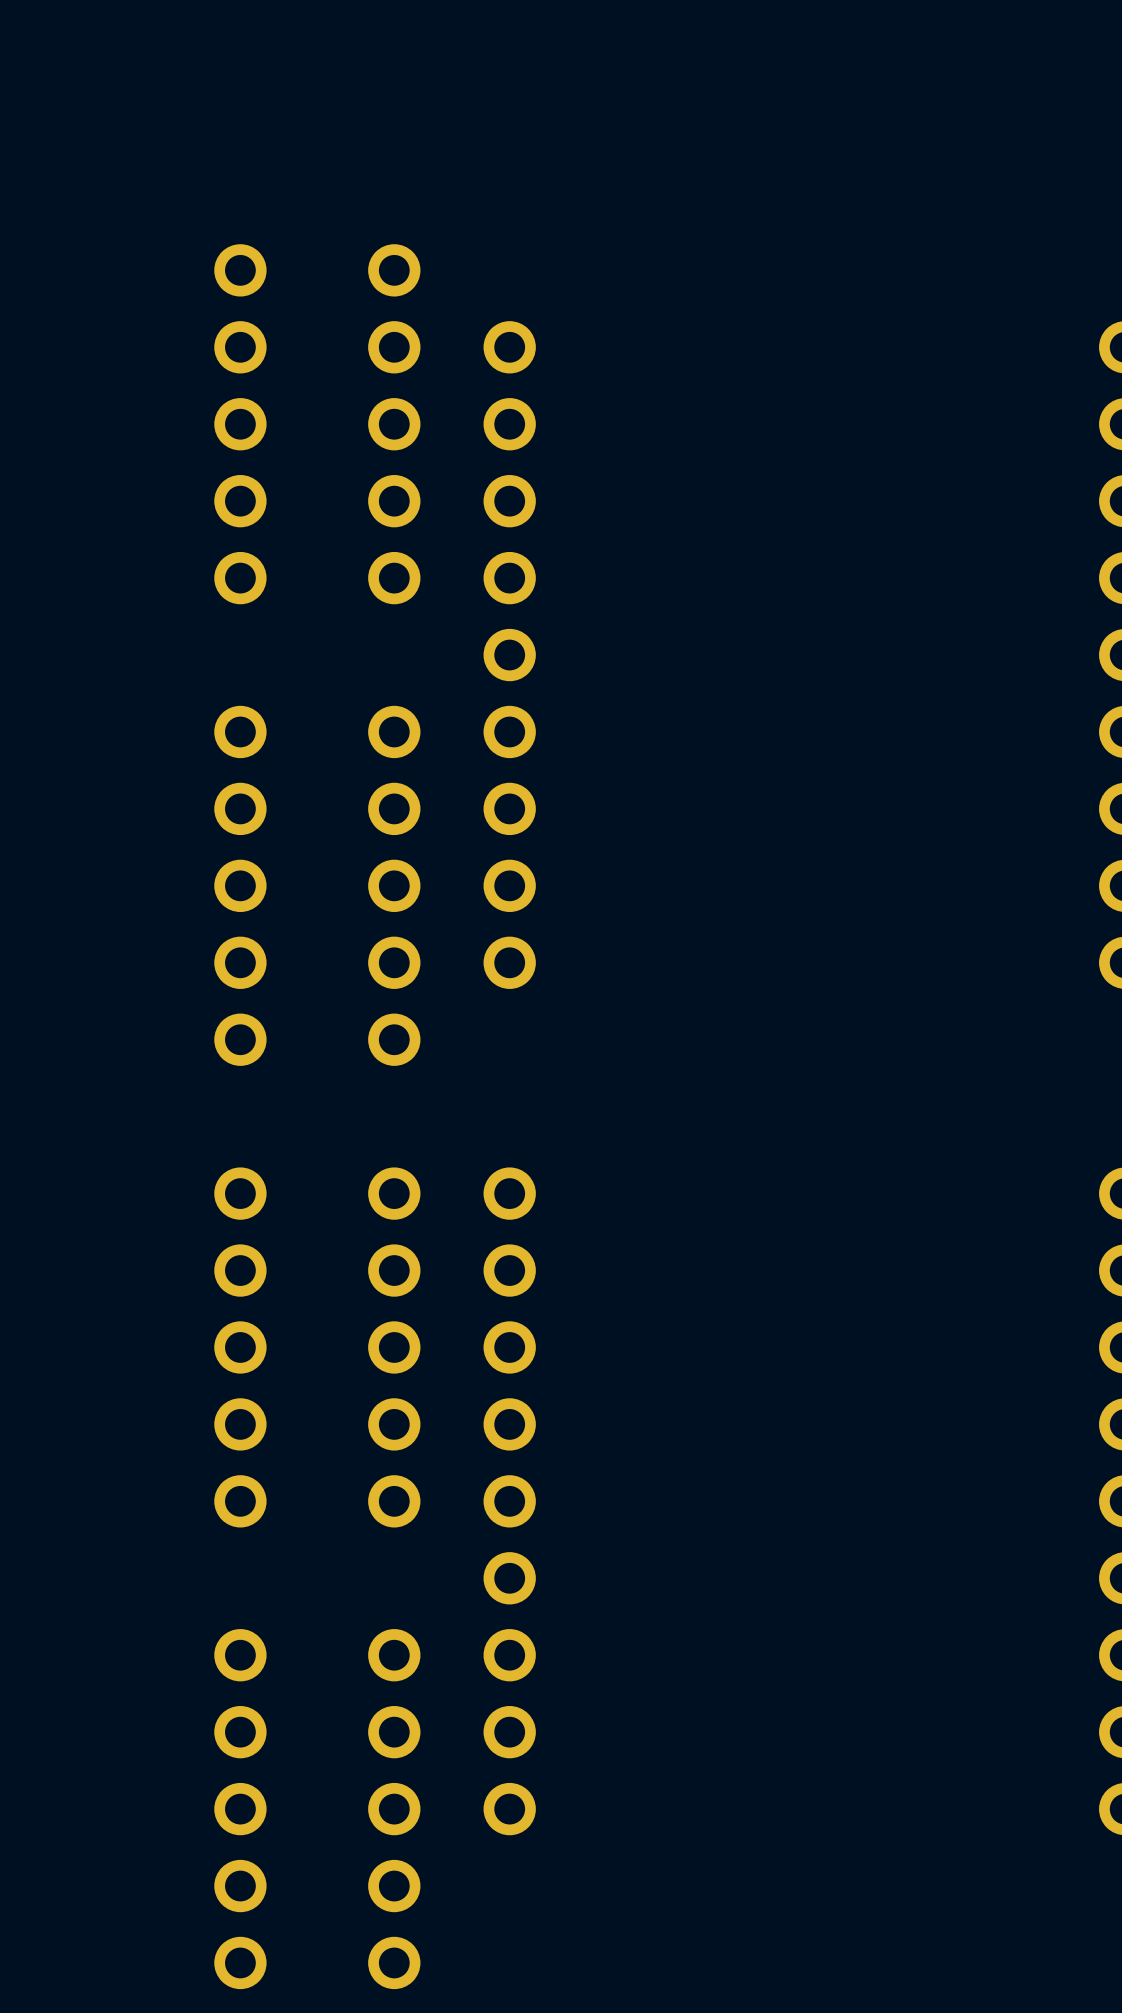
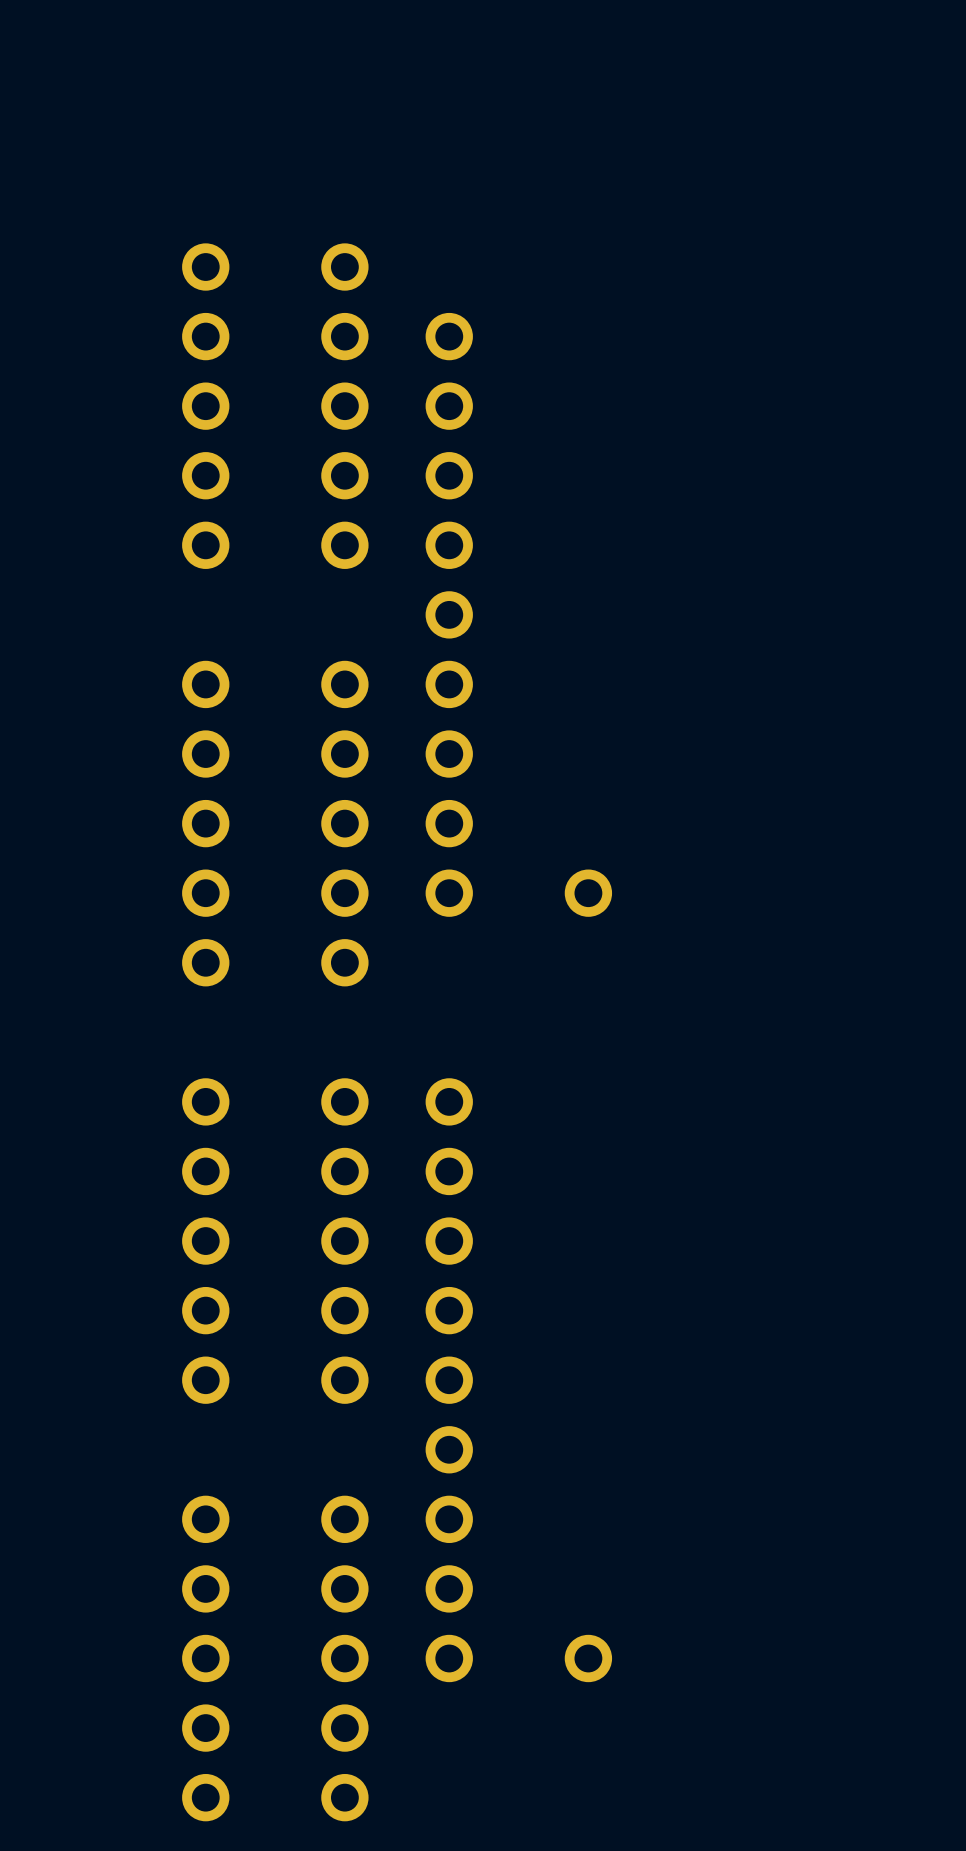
part: none -> (588, 893)
part: none -> (588, 1658)

